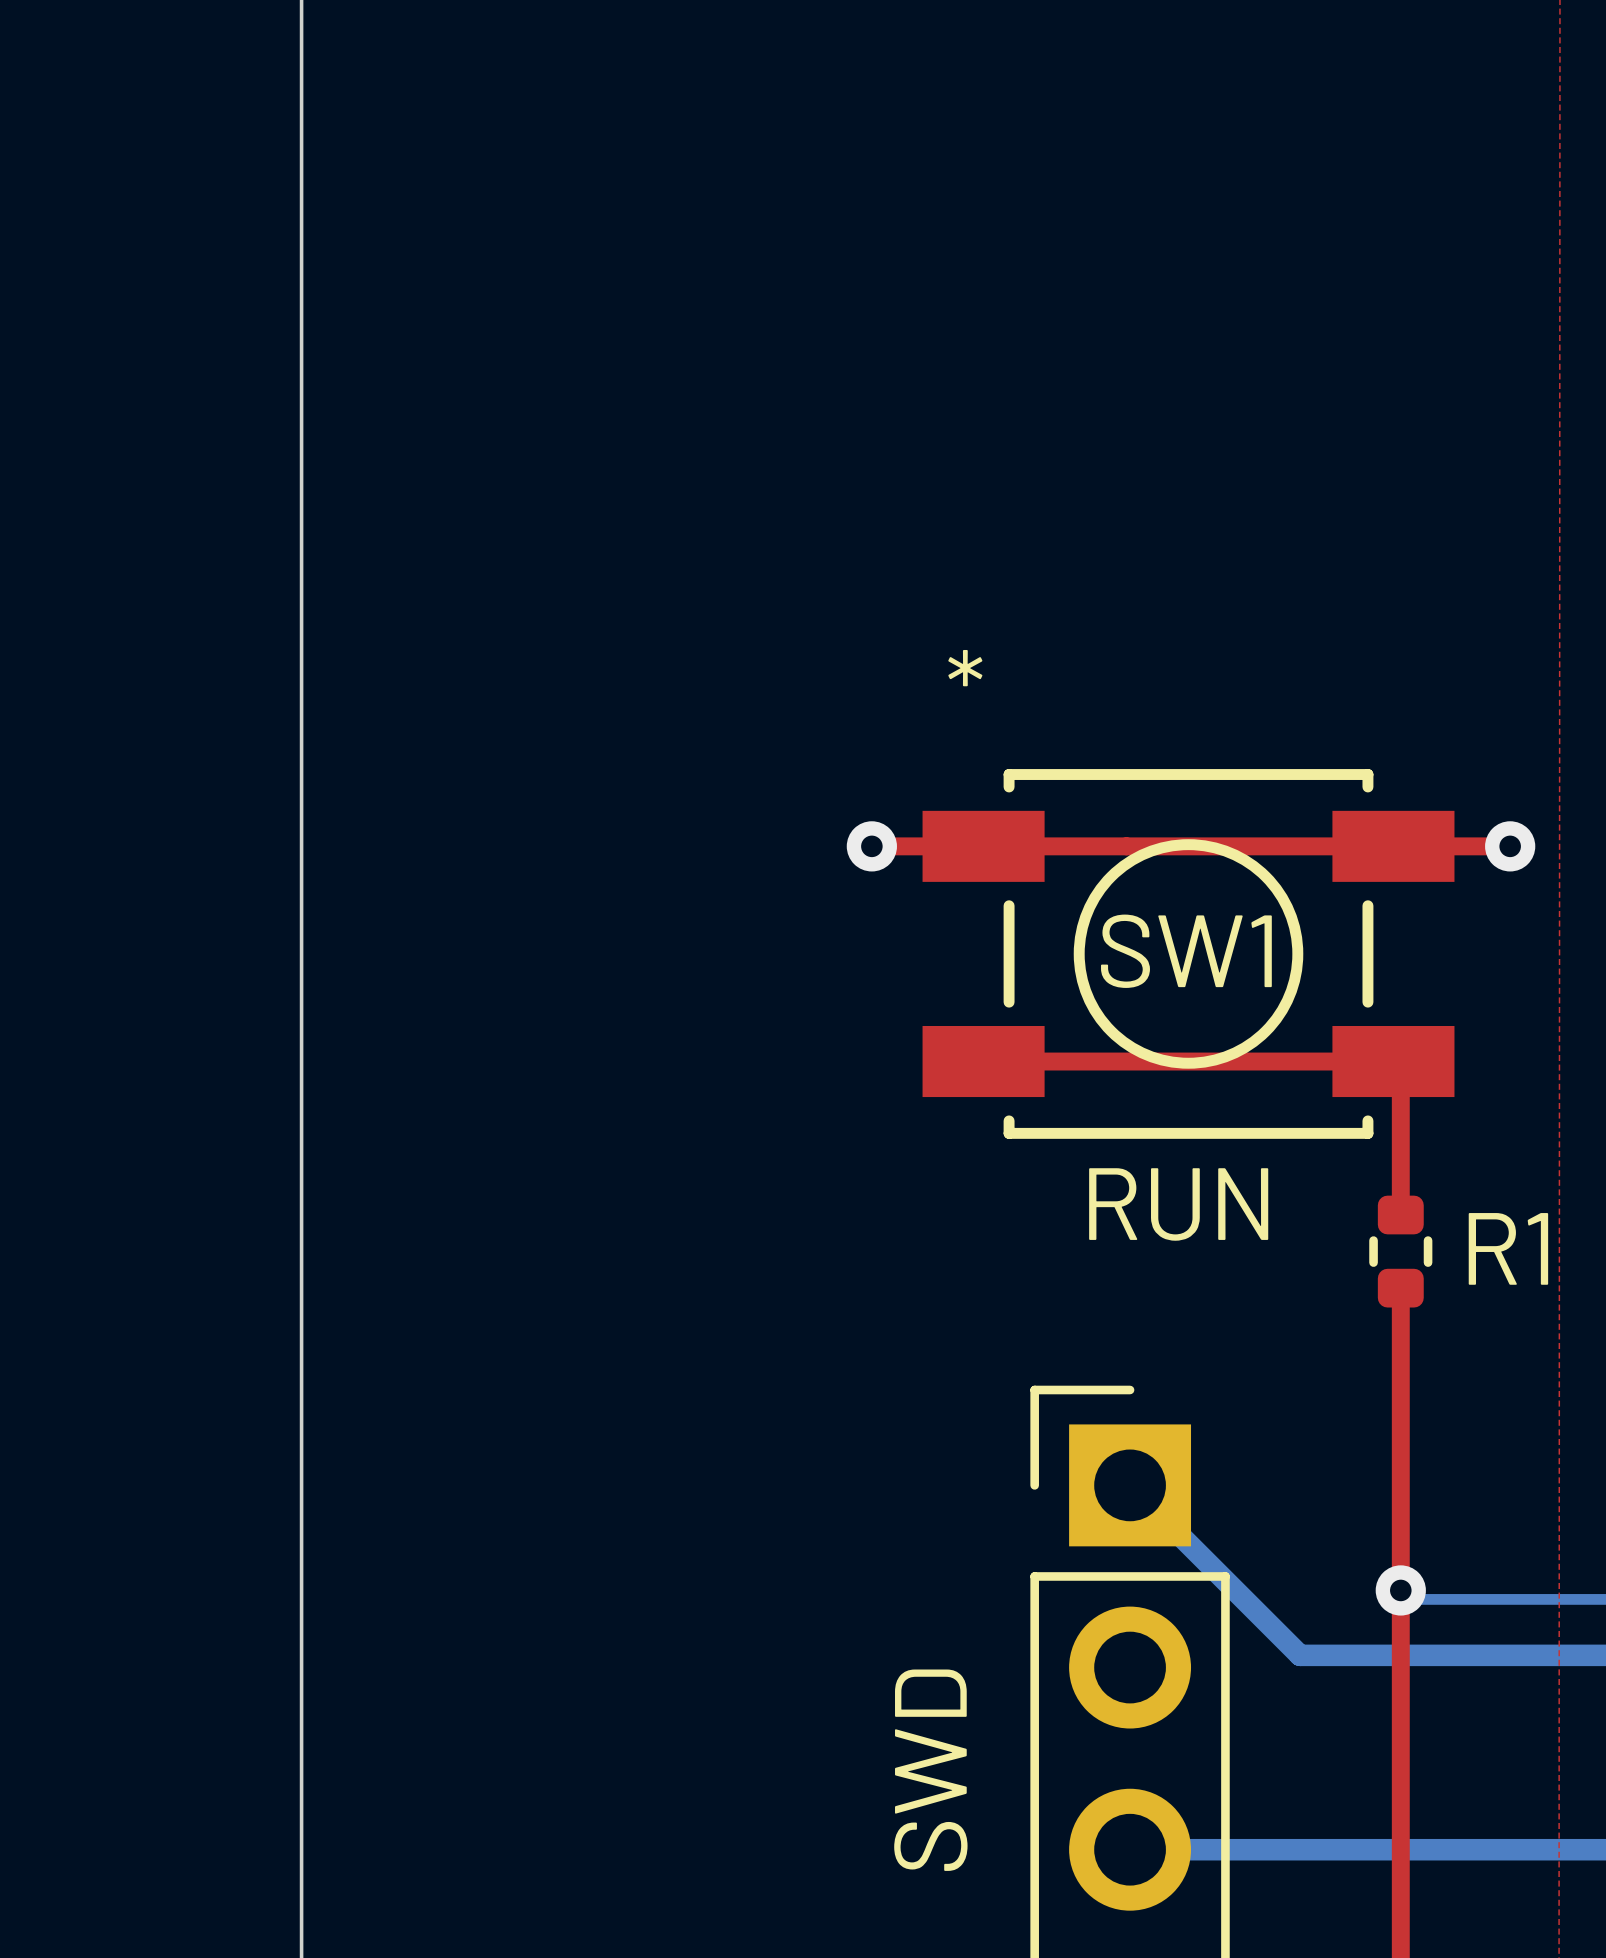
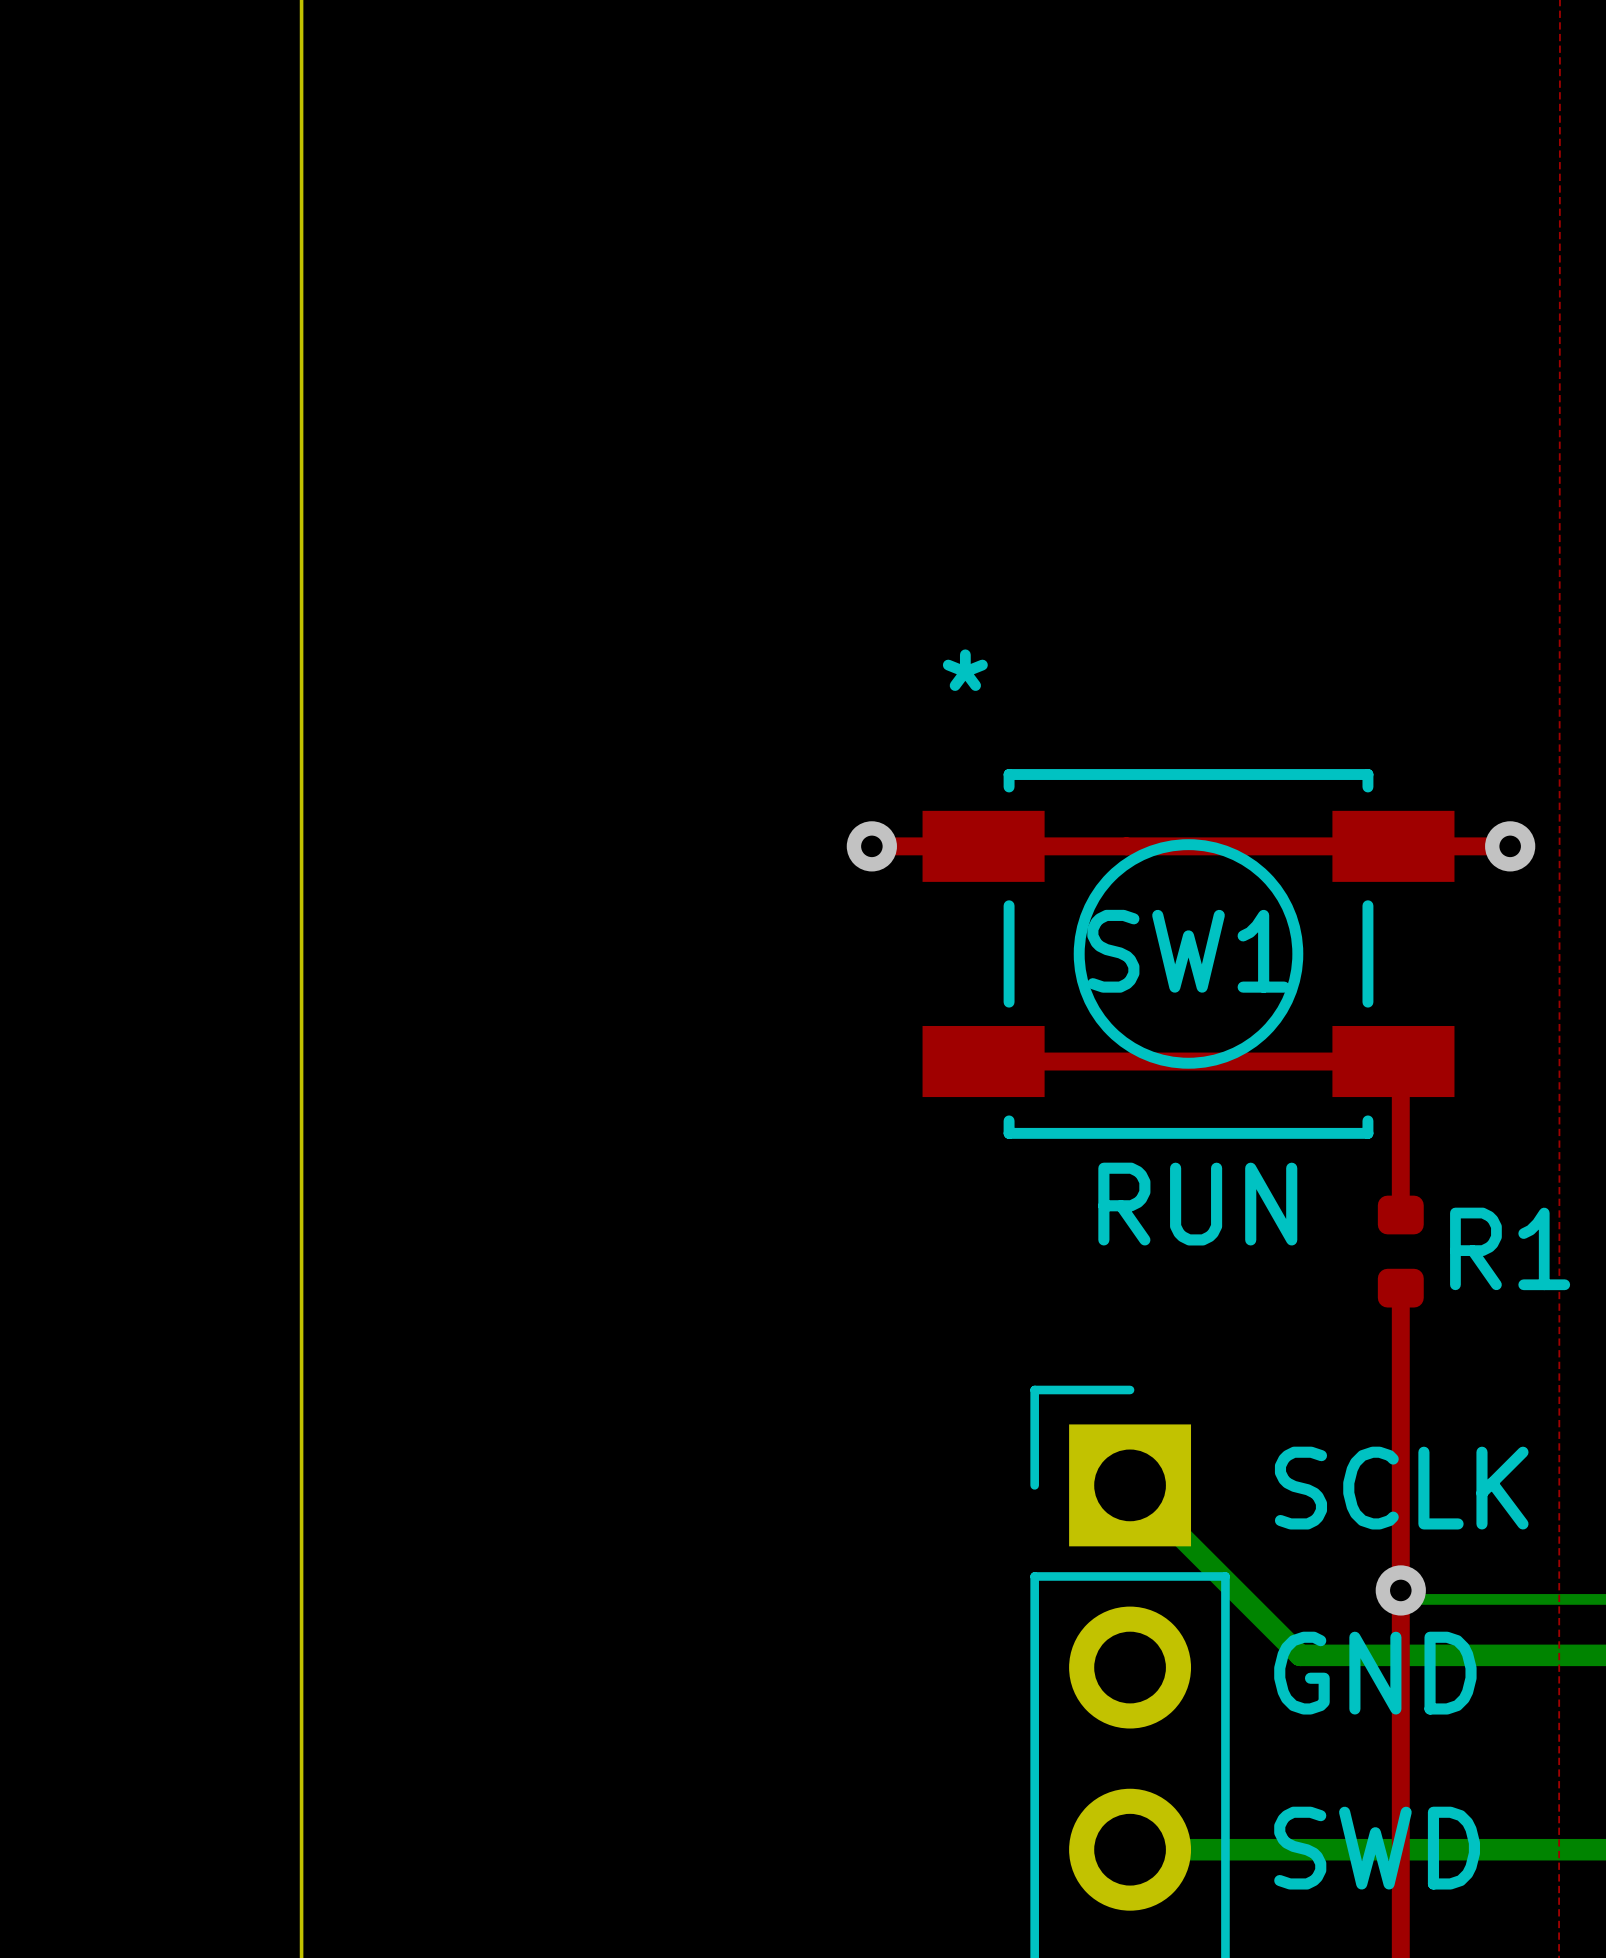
R1 footprint: [1369, 1195, 1433, 1308] -> [1377, 1195, 1424, 1308]
text: none -> SCLK (1401, 1488)
text: none -> GND (1375, 1673)
text rotation: 0° (930, 1770) -> 90° clockwise (1377, 1848)
text position: SWD (930, 1770) -> SWD (1377, 1848)

